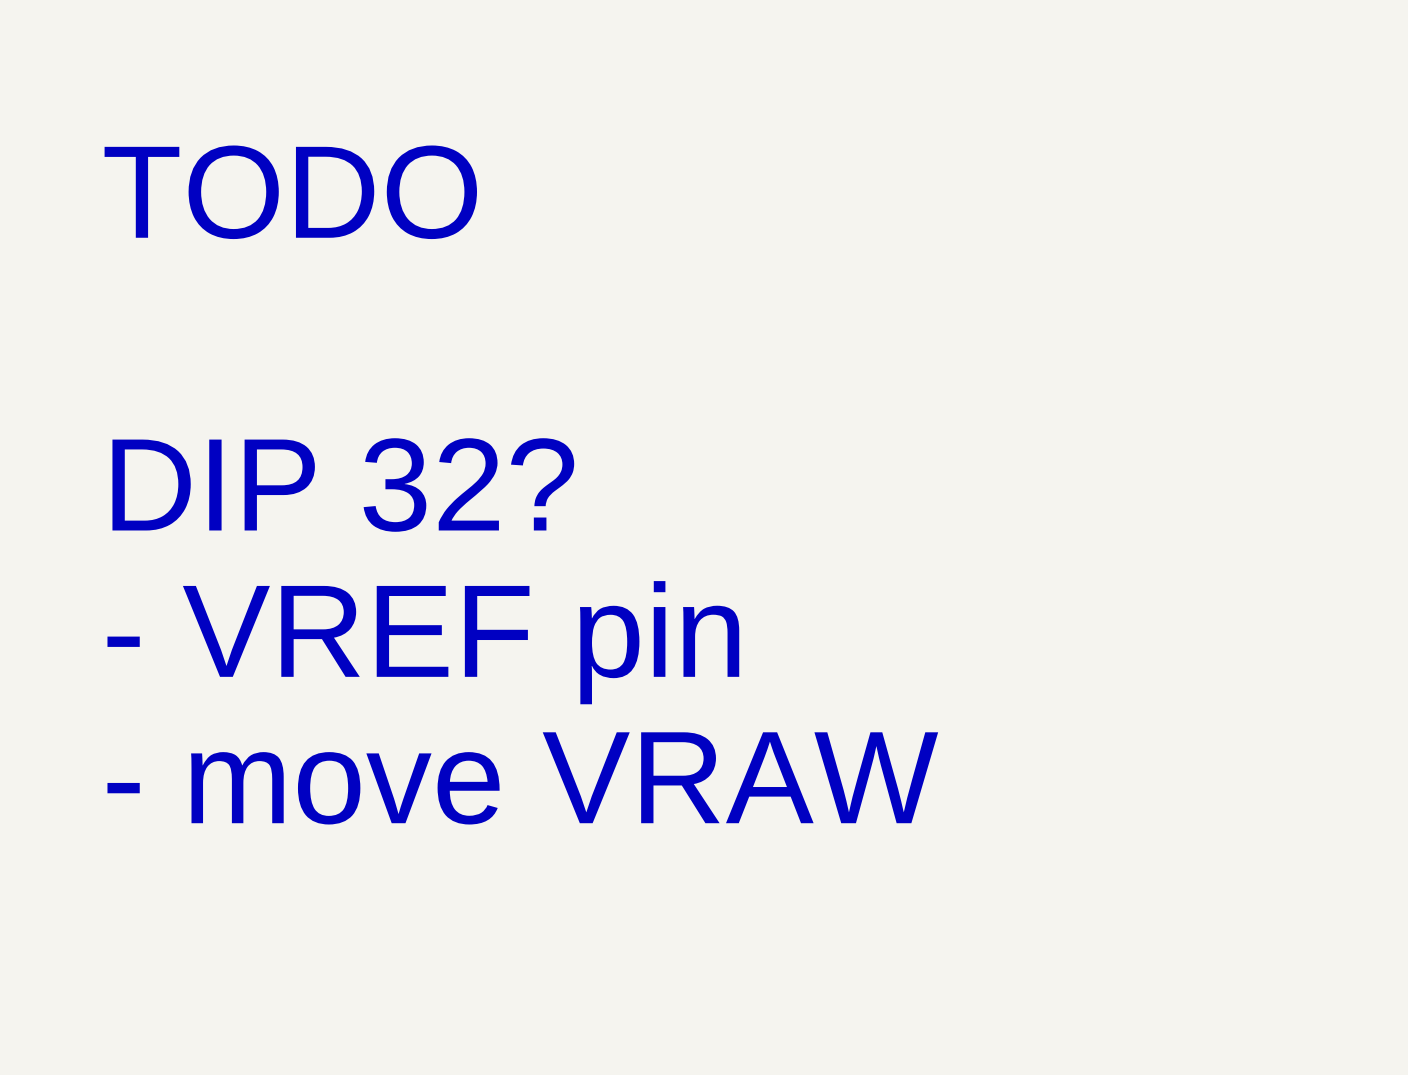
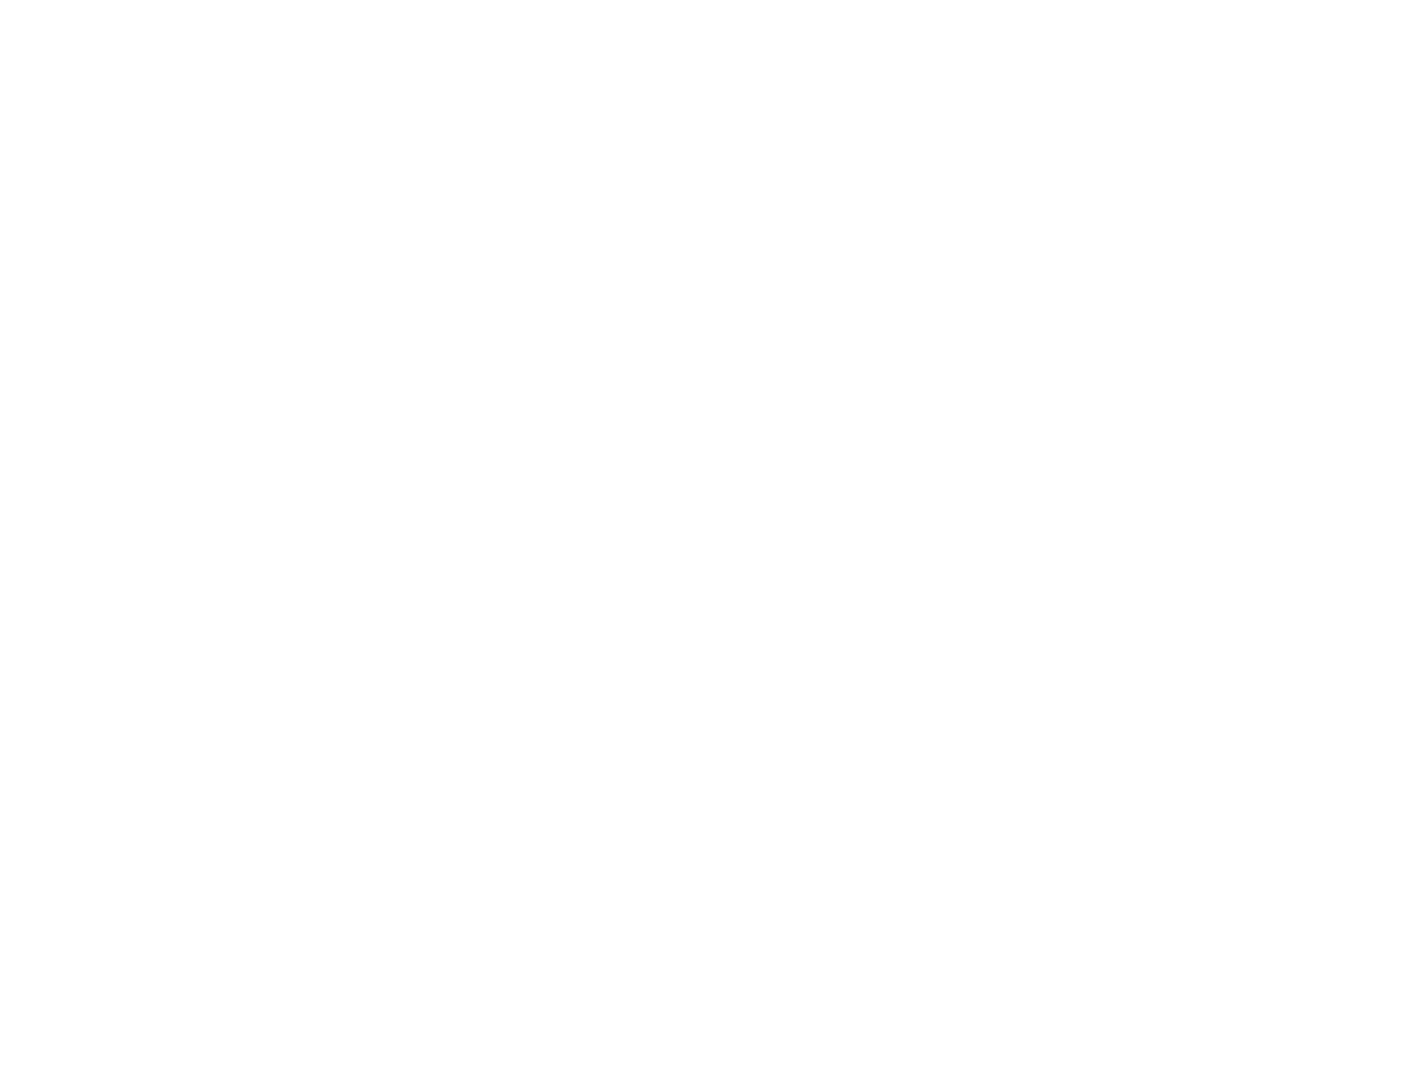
text: TODO (290, 192) -> none
text: DIP 32? (343, 485) -> none
text: - VREF pin (423, 642) -> none
text: - move VRAW (522, 778) -> none

